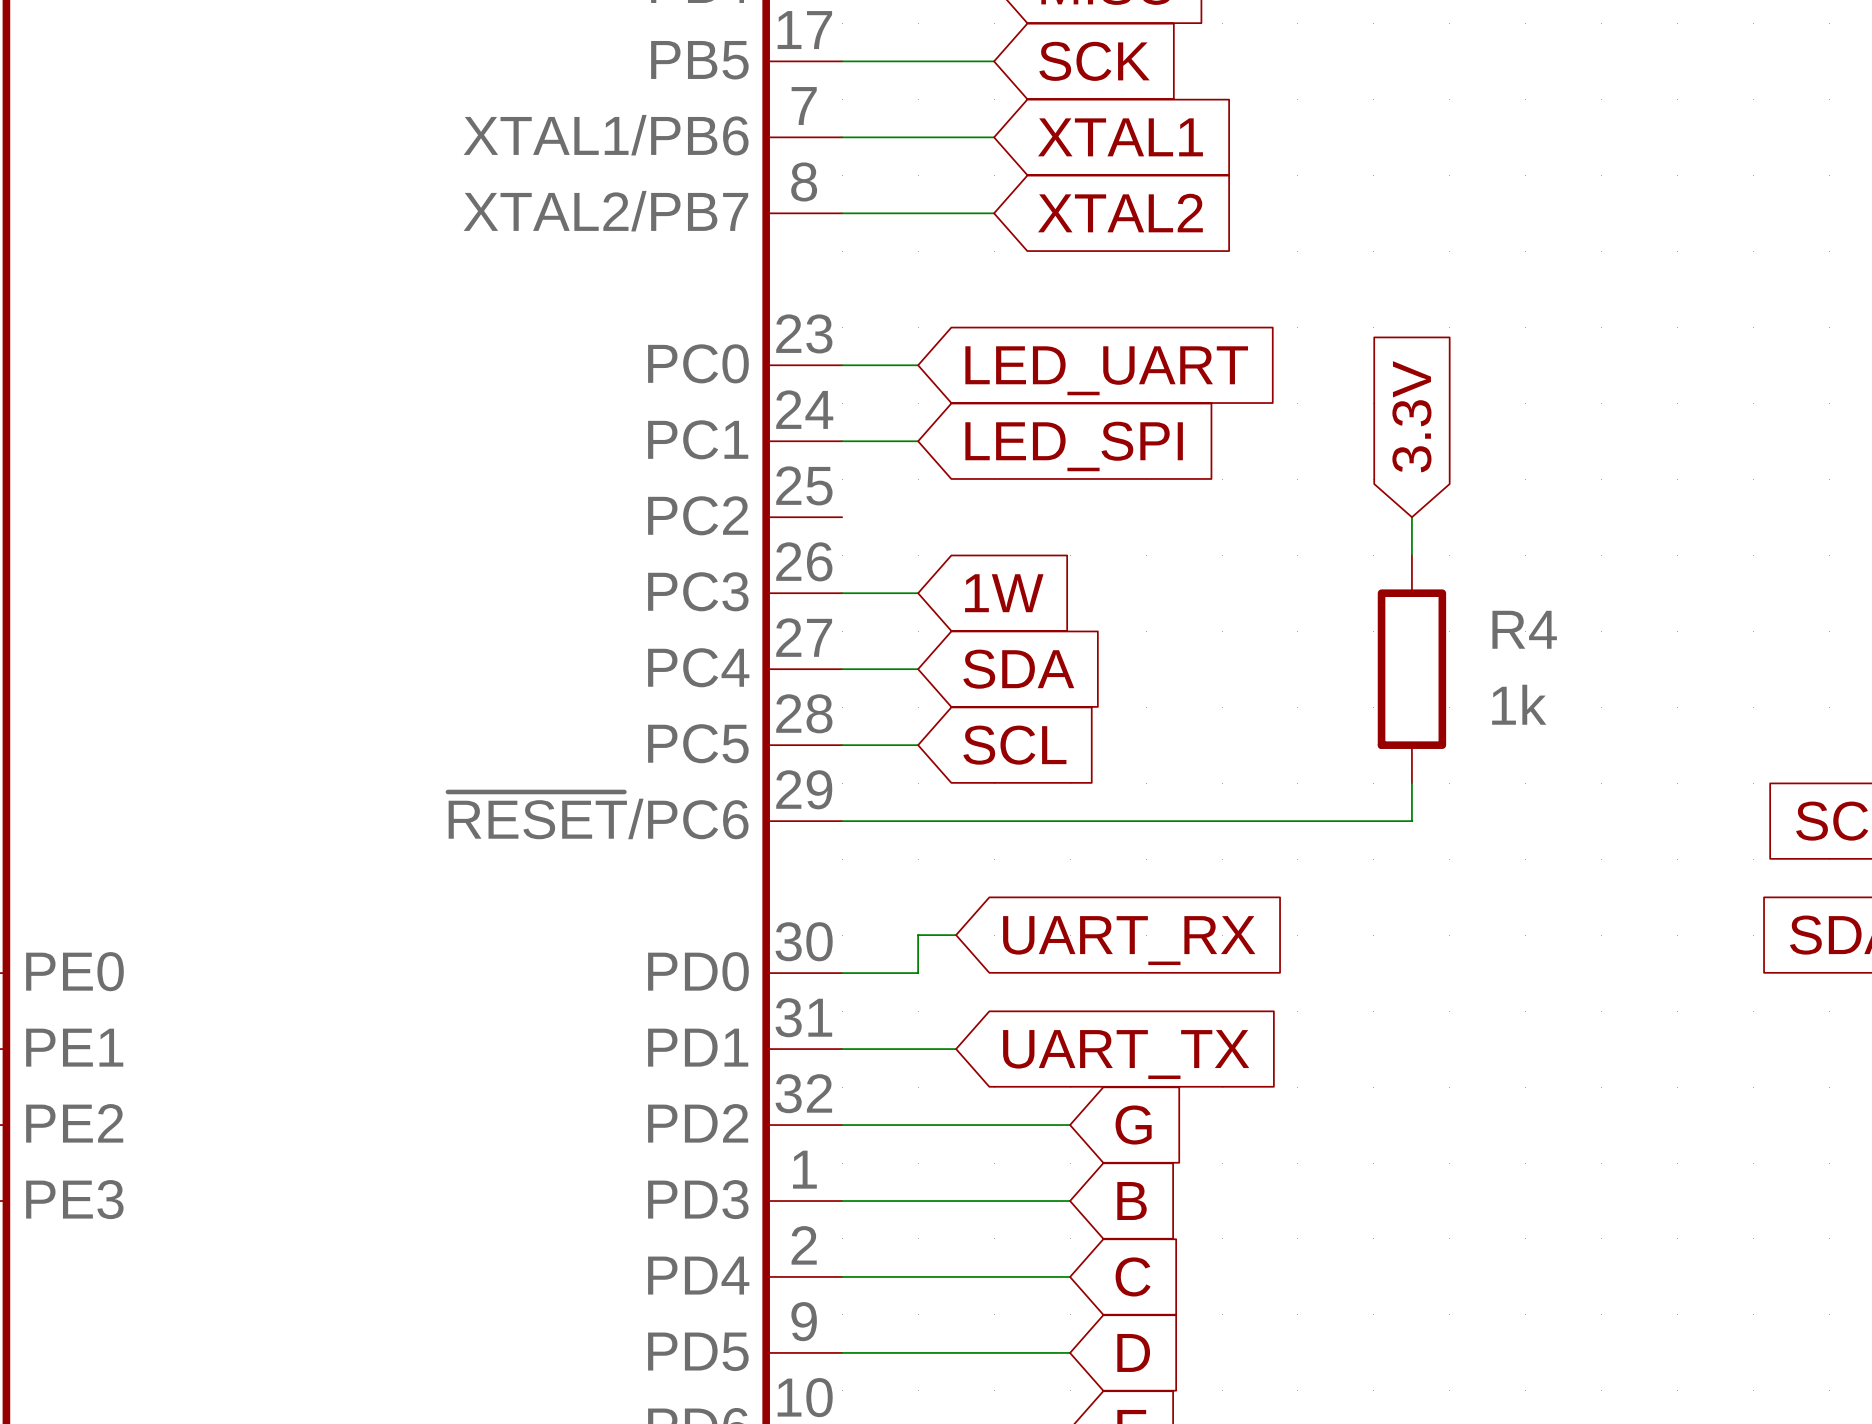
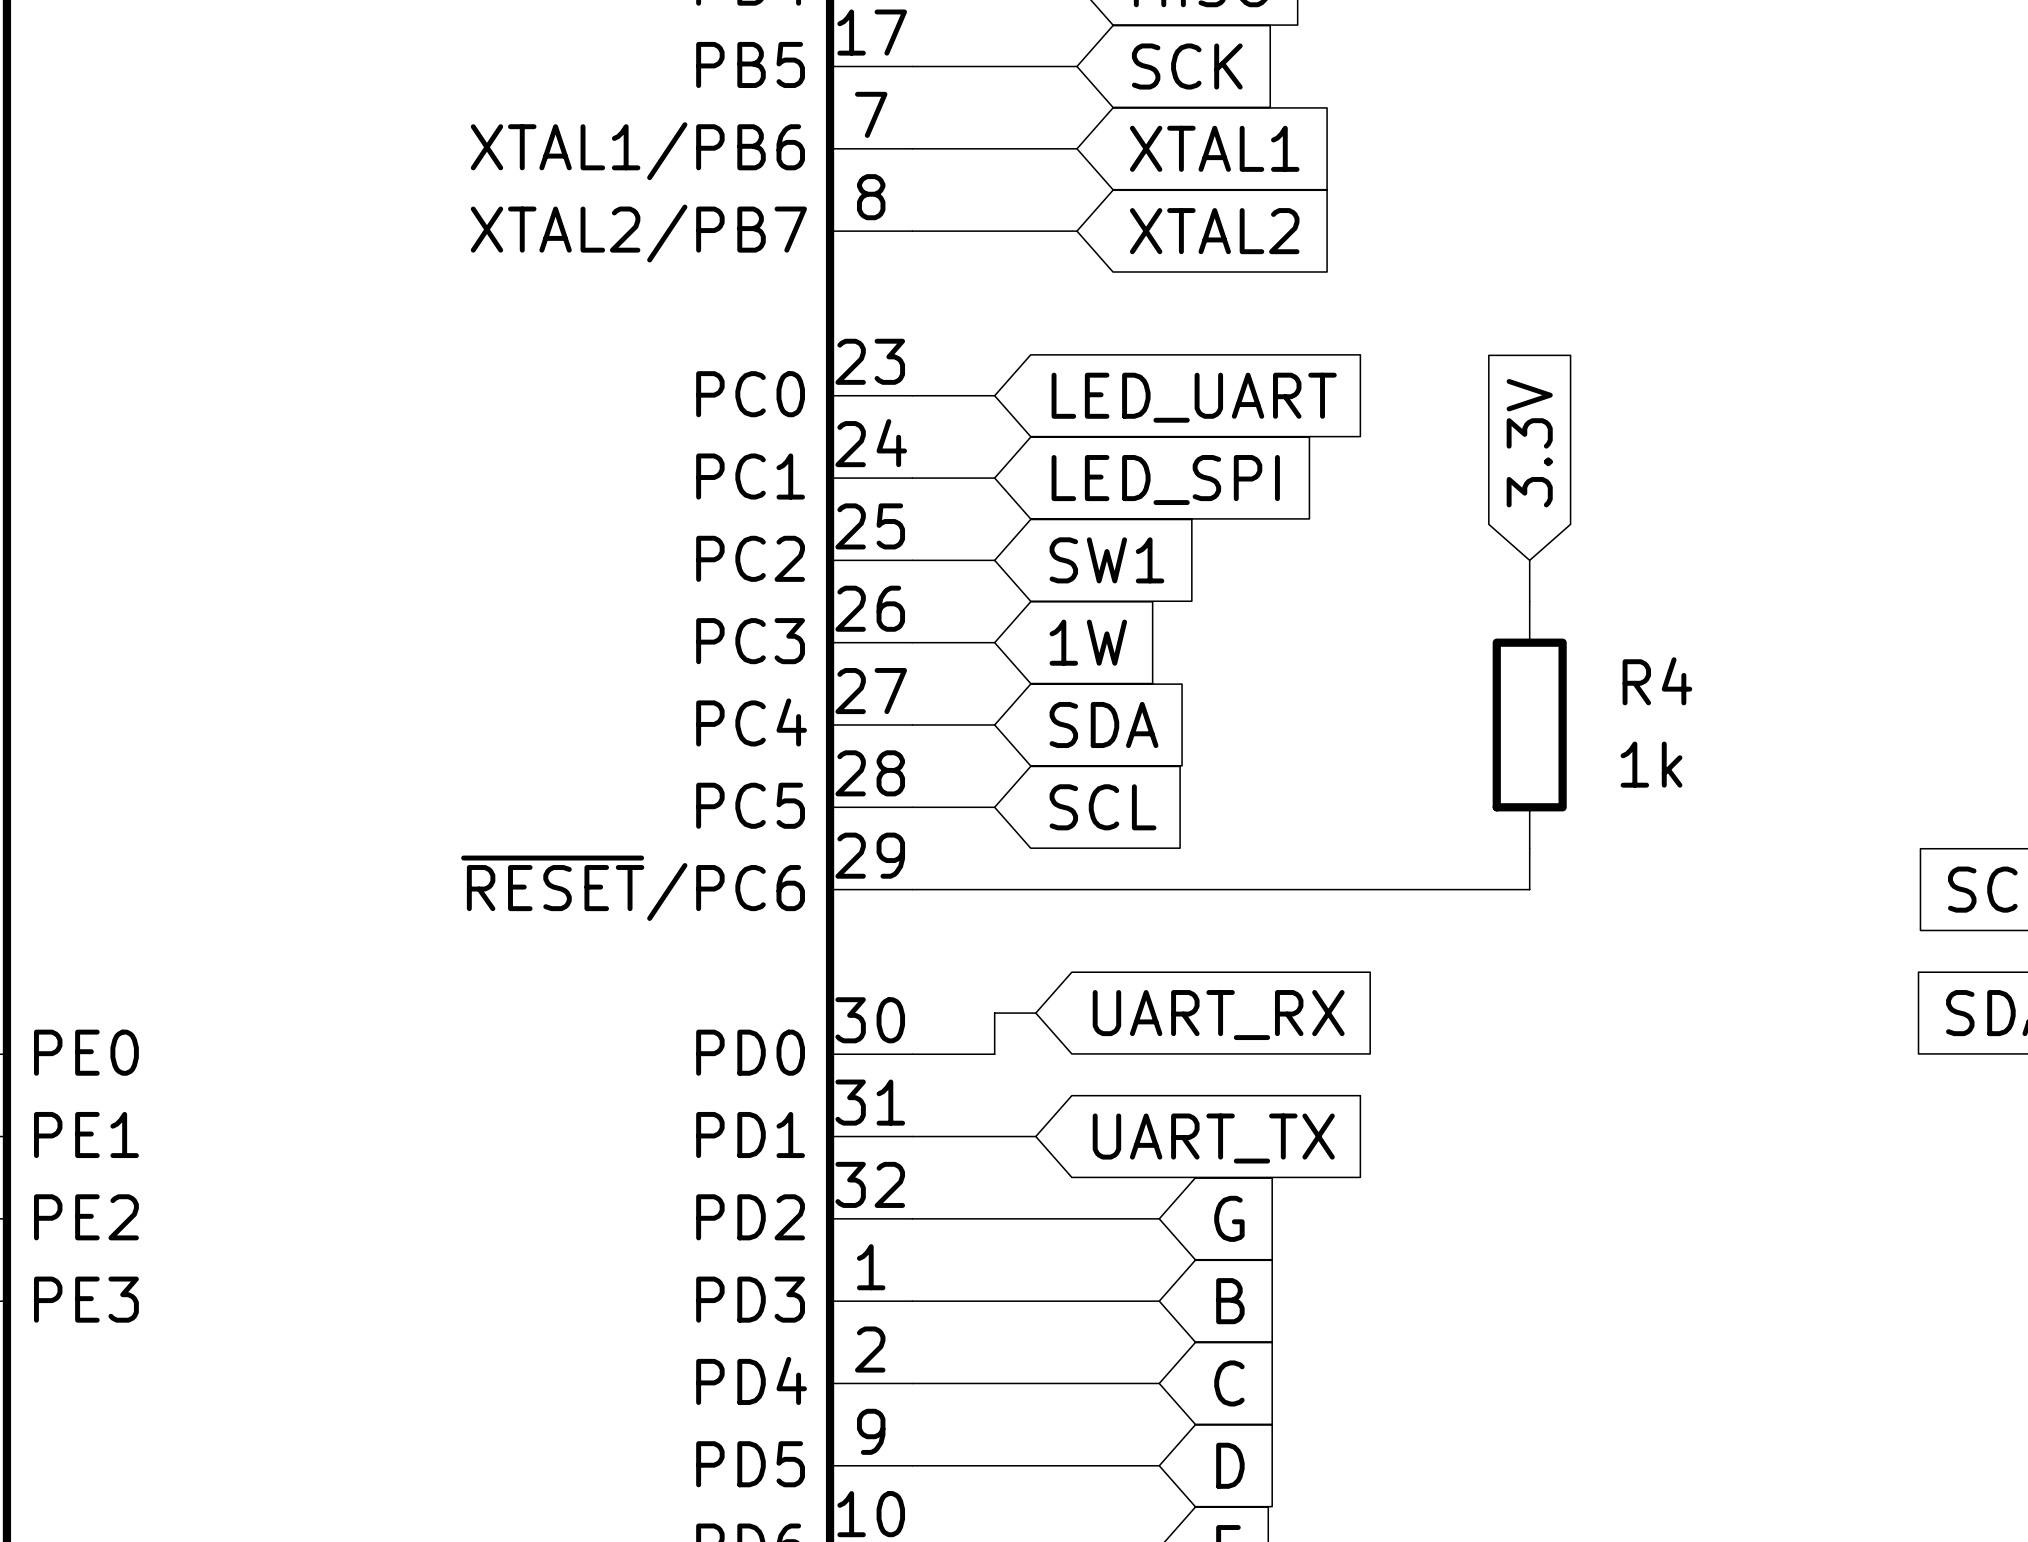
wire: none -> (912, 560) (994, 560)
global label: none -> SW1 (1106, 560)

